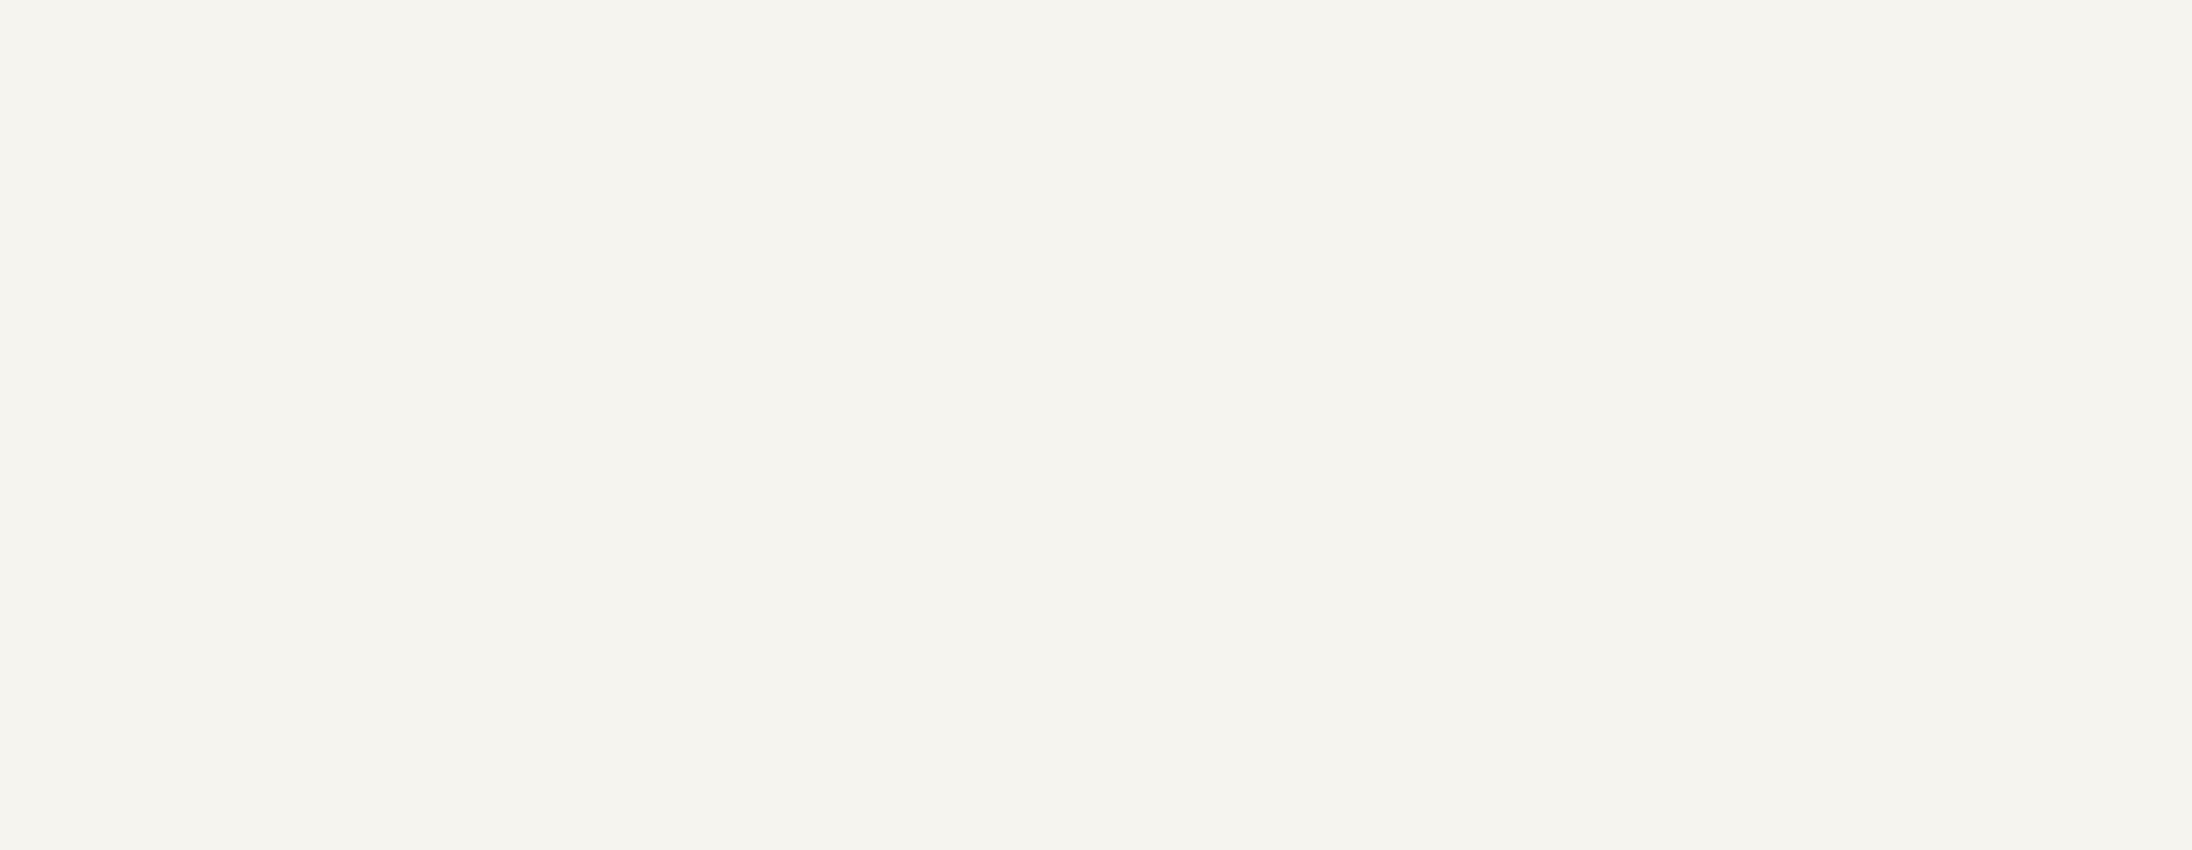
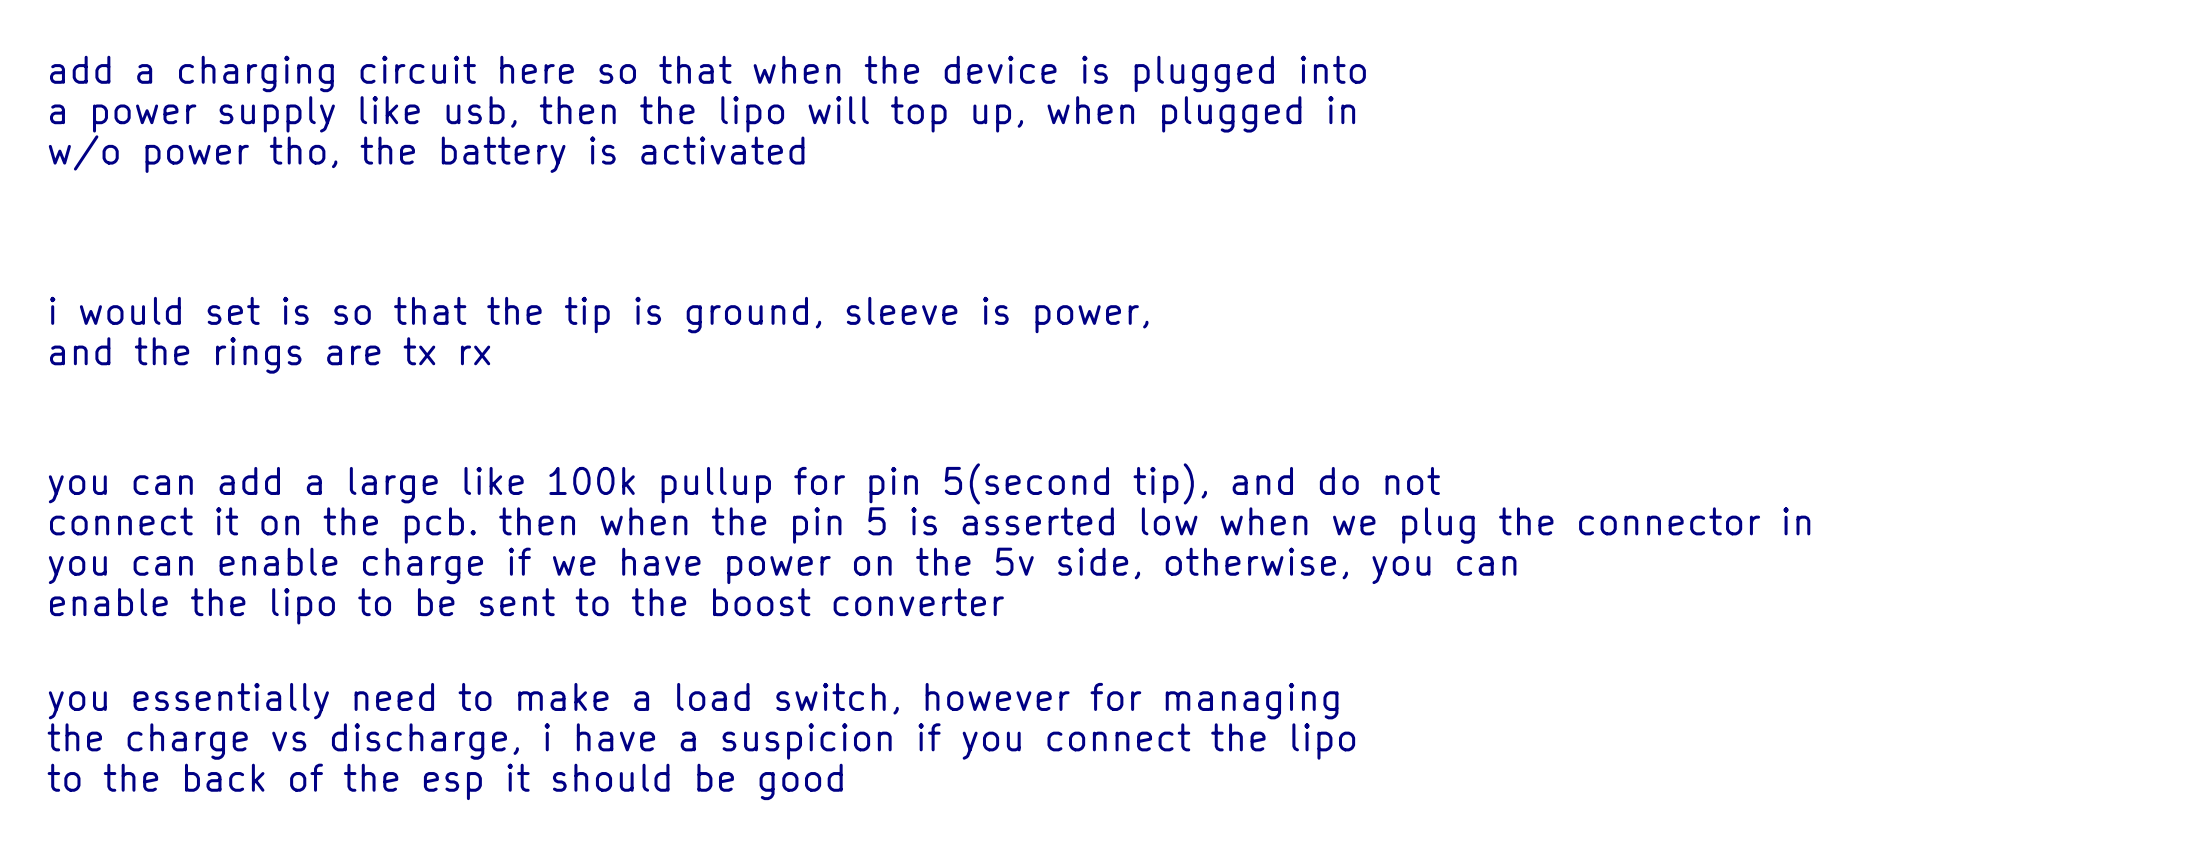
text: none -> add a charging circuit here so that when the device is plugged into (707, 73)
text: none -> a power supply like usb, then the lipo will top up, when plugged in (702, 114)
text: none -> w/o power tho, the battery is activated (426, 154)
text: none -> i would set is so that the tip is ground, sleeve is power, (599, 315)
text: none -> and the rings are tx rx (270, 355)
text: none -> you can add a large like 100k pullup for pin 5(second tip), and do not (744, 483)
text: none -> connect it on the pcb. then when the pin 5 is asserted low when we plug the connector in (930, 525)
text: none -> you can enable charge if we have power on the 5v side, otherwise, you can (782, 565)
text: none -> enable the lipo to be sent to the boost converter (526, 606)
text: none -> you essentially need to make a load switch, however for managing (693, 701)
text: none -> the charge vs discharge, i have a suspicion if you connect the lipo (701, 741)
text: none -> to the back of the esp it should be good (445, 781)

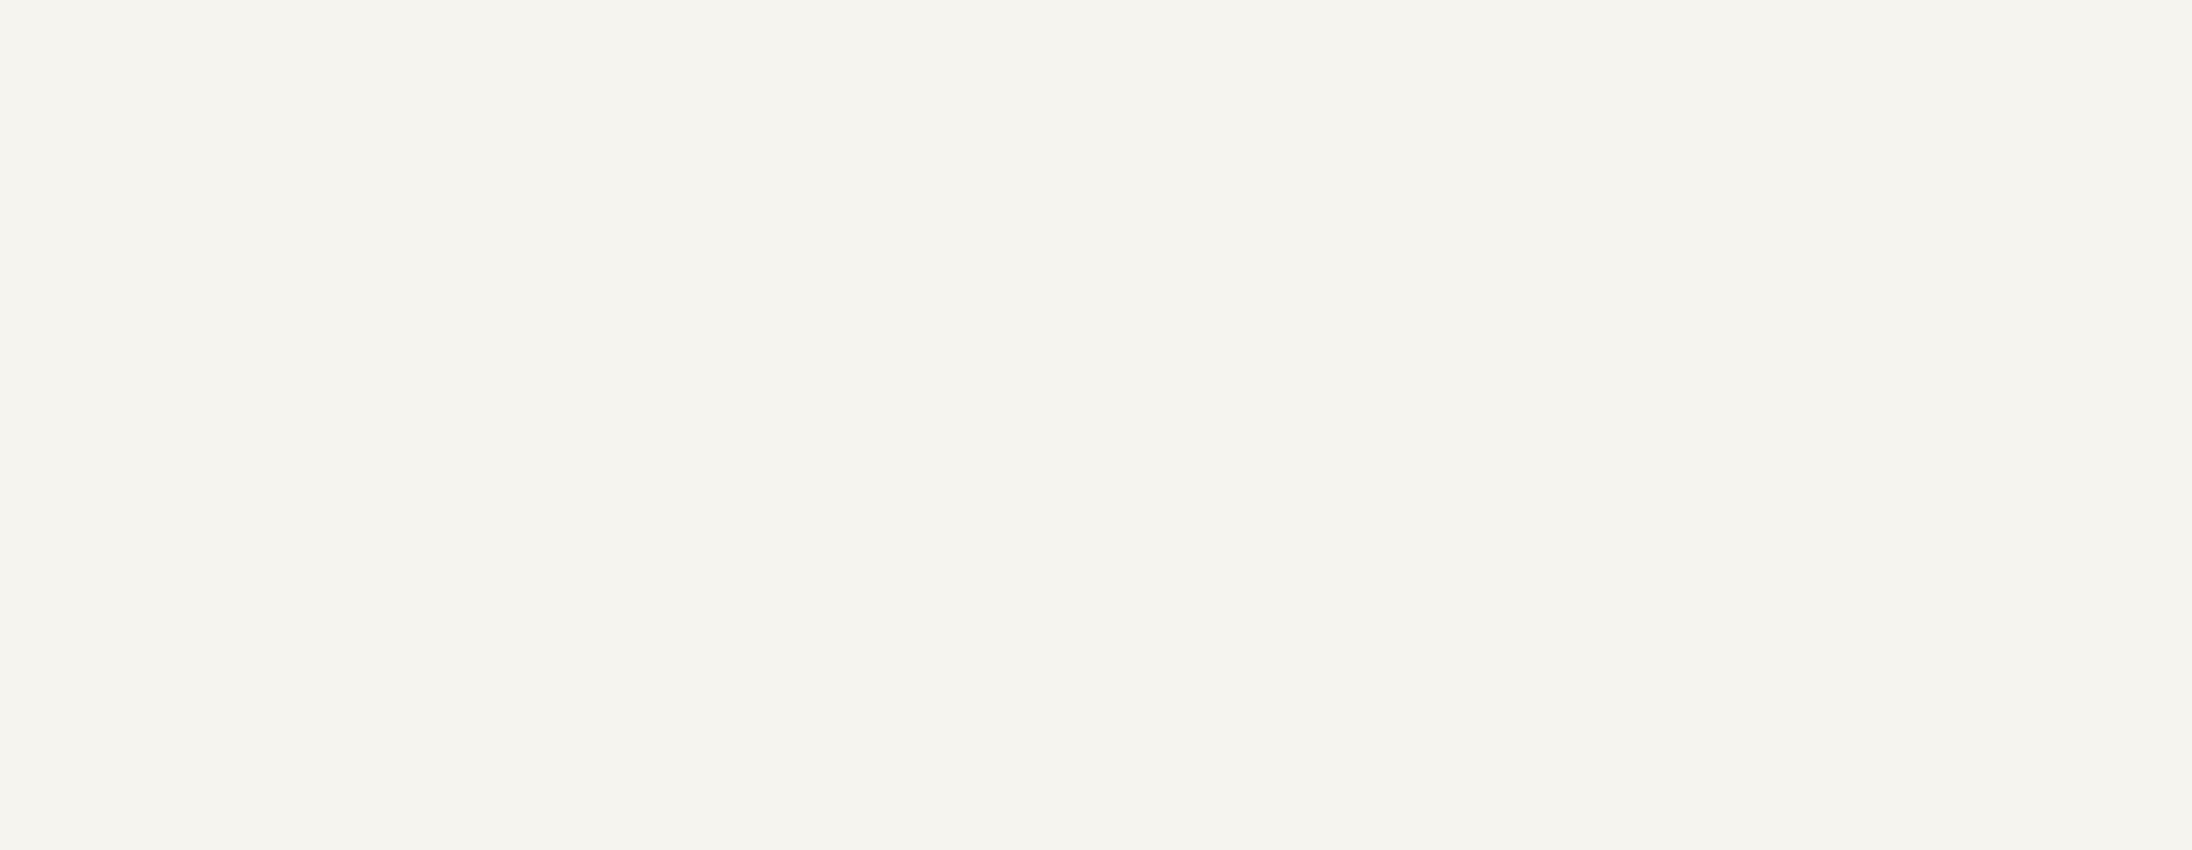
text: add a charging circuit here so that when the device is plugged into (707, 73) -> none
text: a power supply like usb, then the lipo will top up, when plugged in (702, 114) -> none
text: w/o power tho, the battery is activated (426, 154) -> none
text: i would set is so that the tip is ground, sleeve is power, (599, 315) -> none
text: and the rings are tx rx (270, 355) -> none
text: you can add a large like 100k pullup for pin 5(second tip), and do not (744, 483) -> none
text: connect it on the pcb. then when the pin 5 is asserted low when we plug the connector in (930, 525) -> none
text: you can enable charge if we have power on the 5v side, otherwise, you can (782, 565) -> none
text: enable the lipo to be sent to the boost converter (526, 606) -> none
text: you essentially need to make a load switch, however for managing (693, 701) -> none
text: the charge vs discharge, i have a suspicion if you connect the lipo (701, 741) -> none
text: to the back of the esp it should be good (445, 781) -> none

